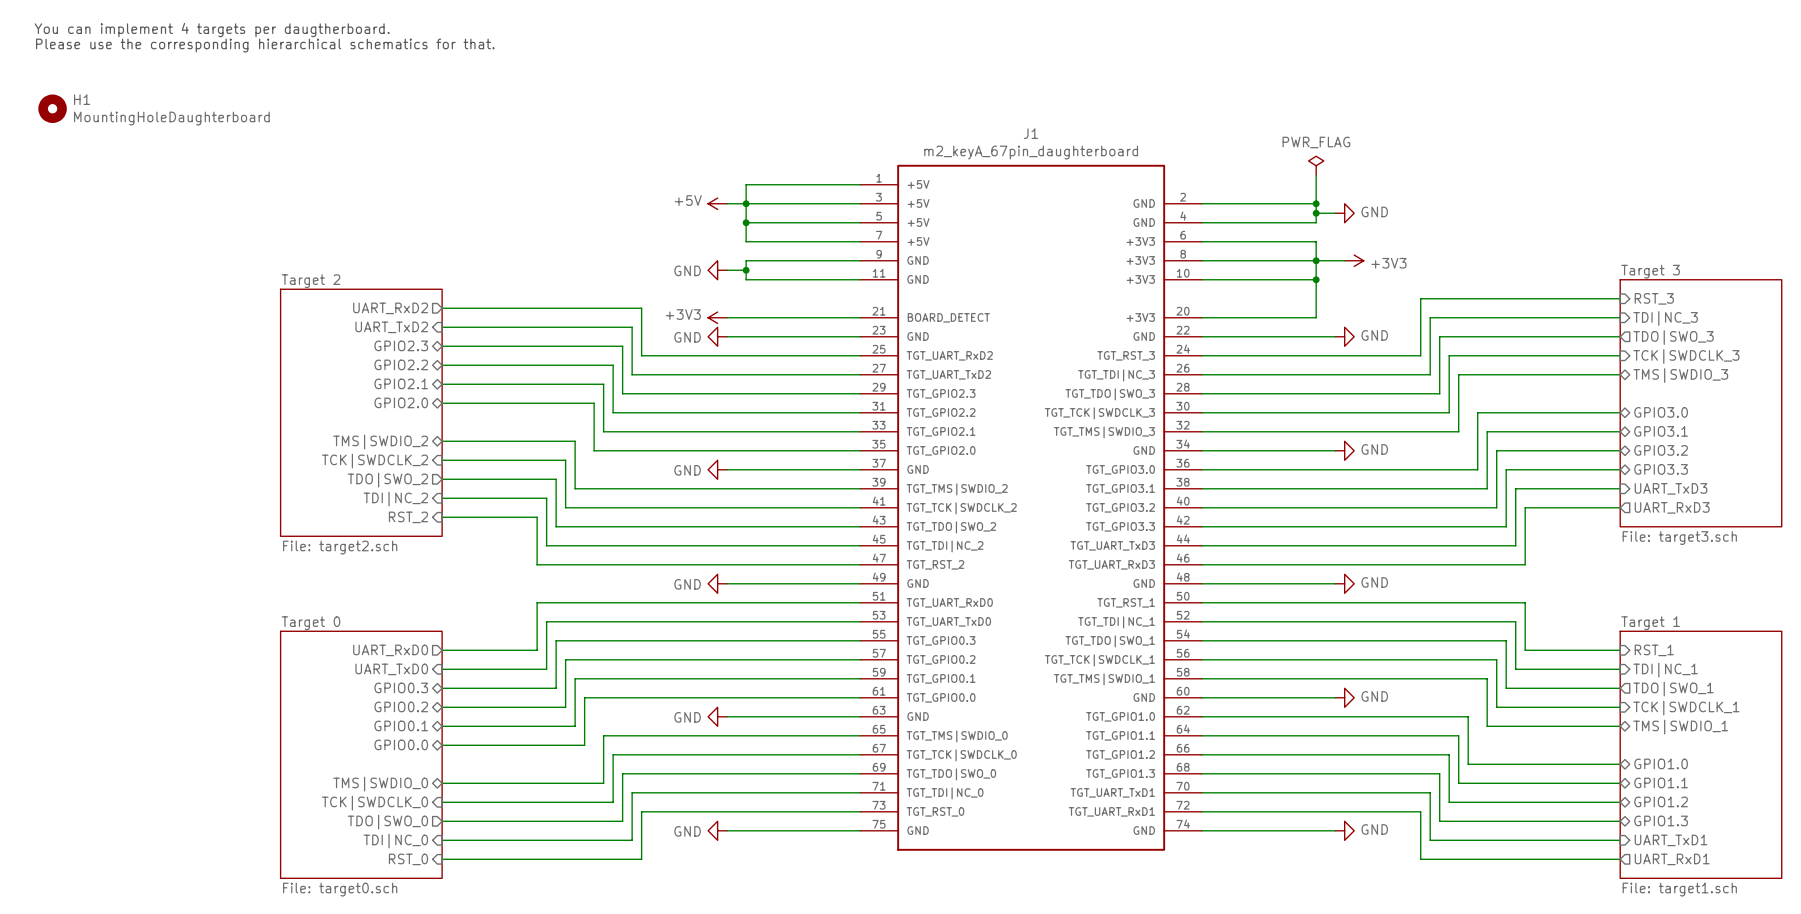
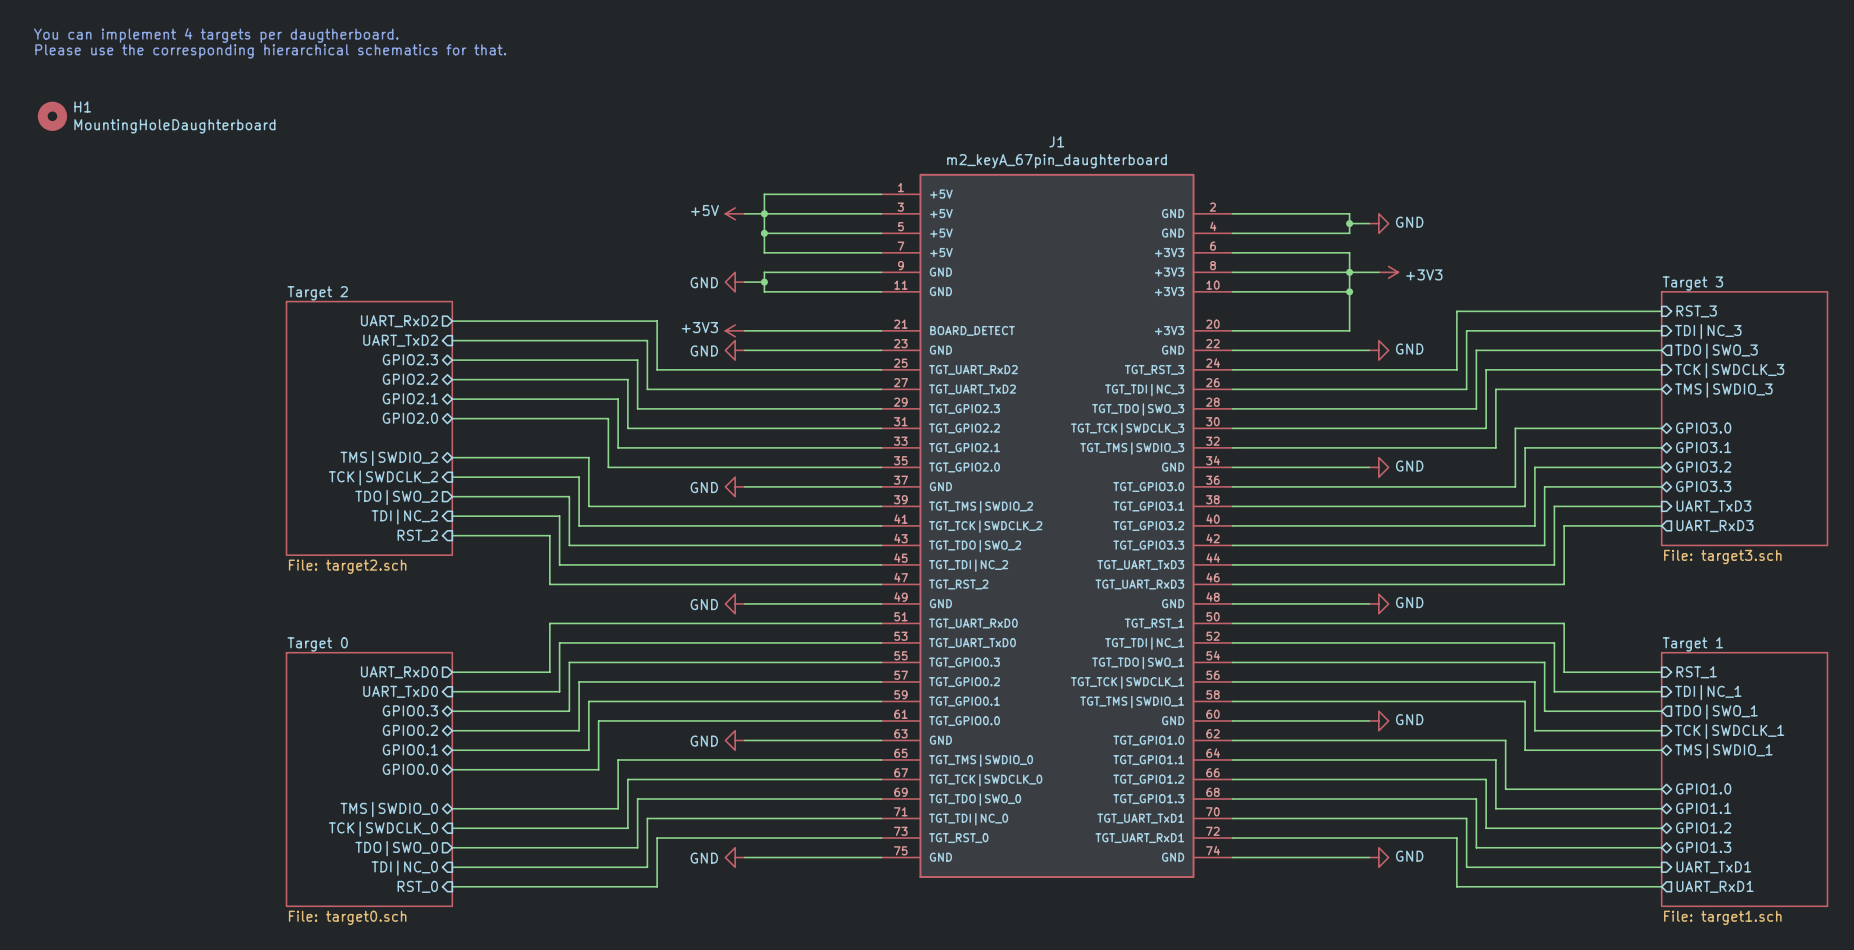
power symbol: PWR_FLAG (1316, 165) -> none
wire: (1316, 175) (1316, 203) -> none
junction: (1316, 203) -> none

